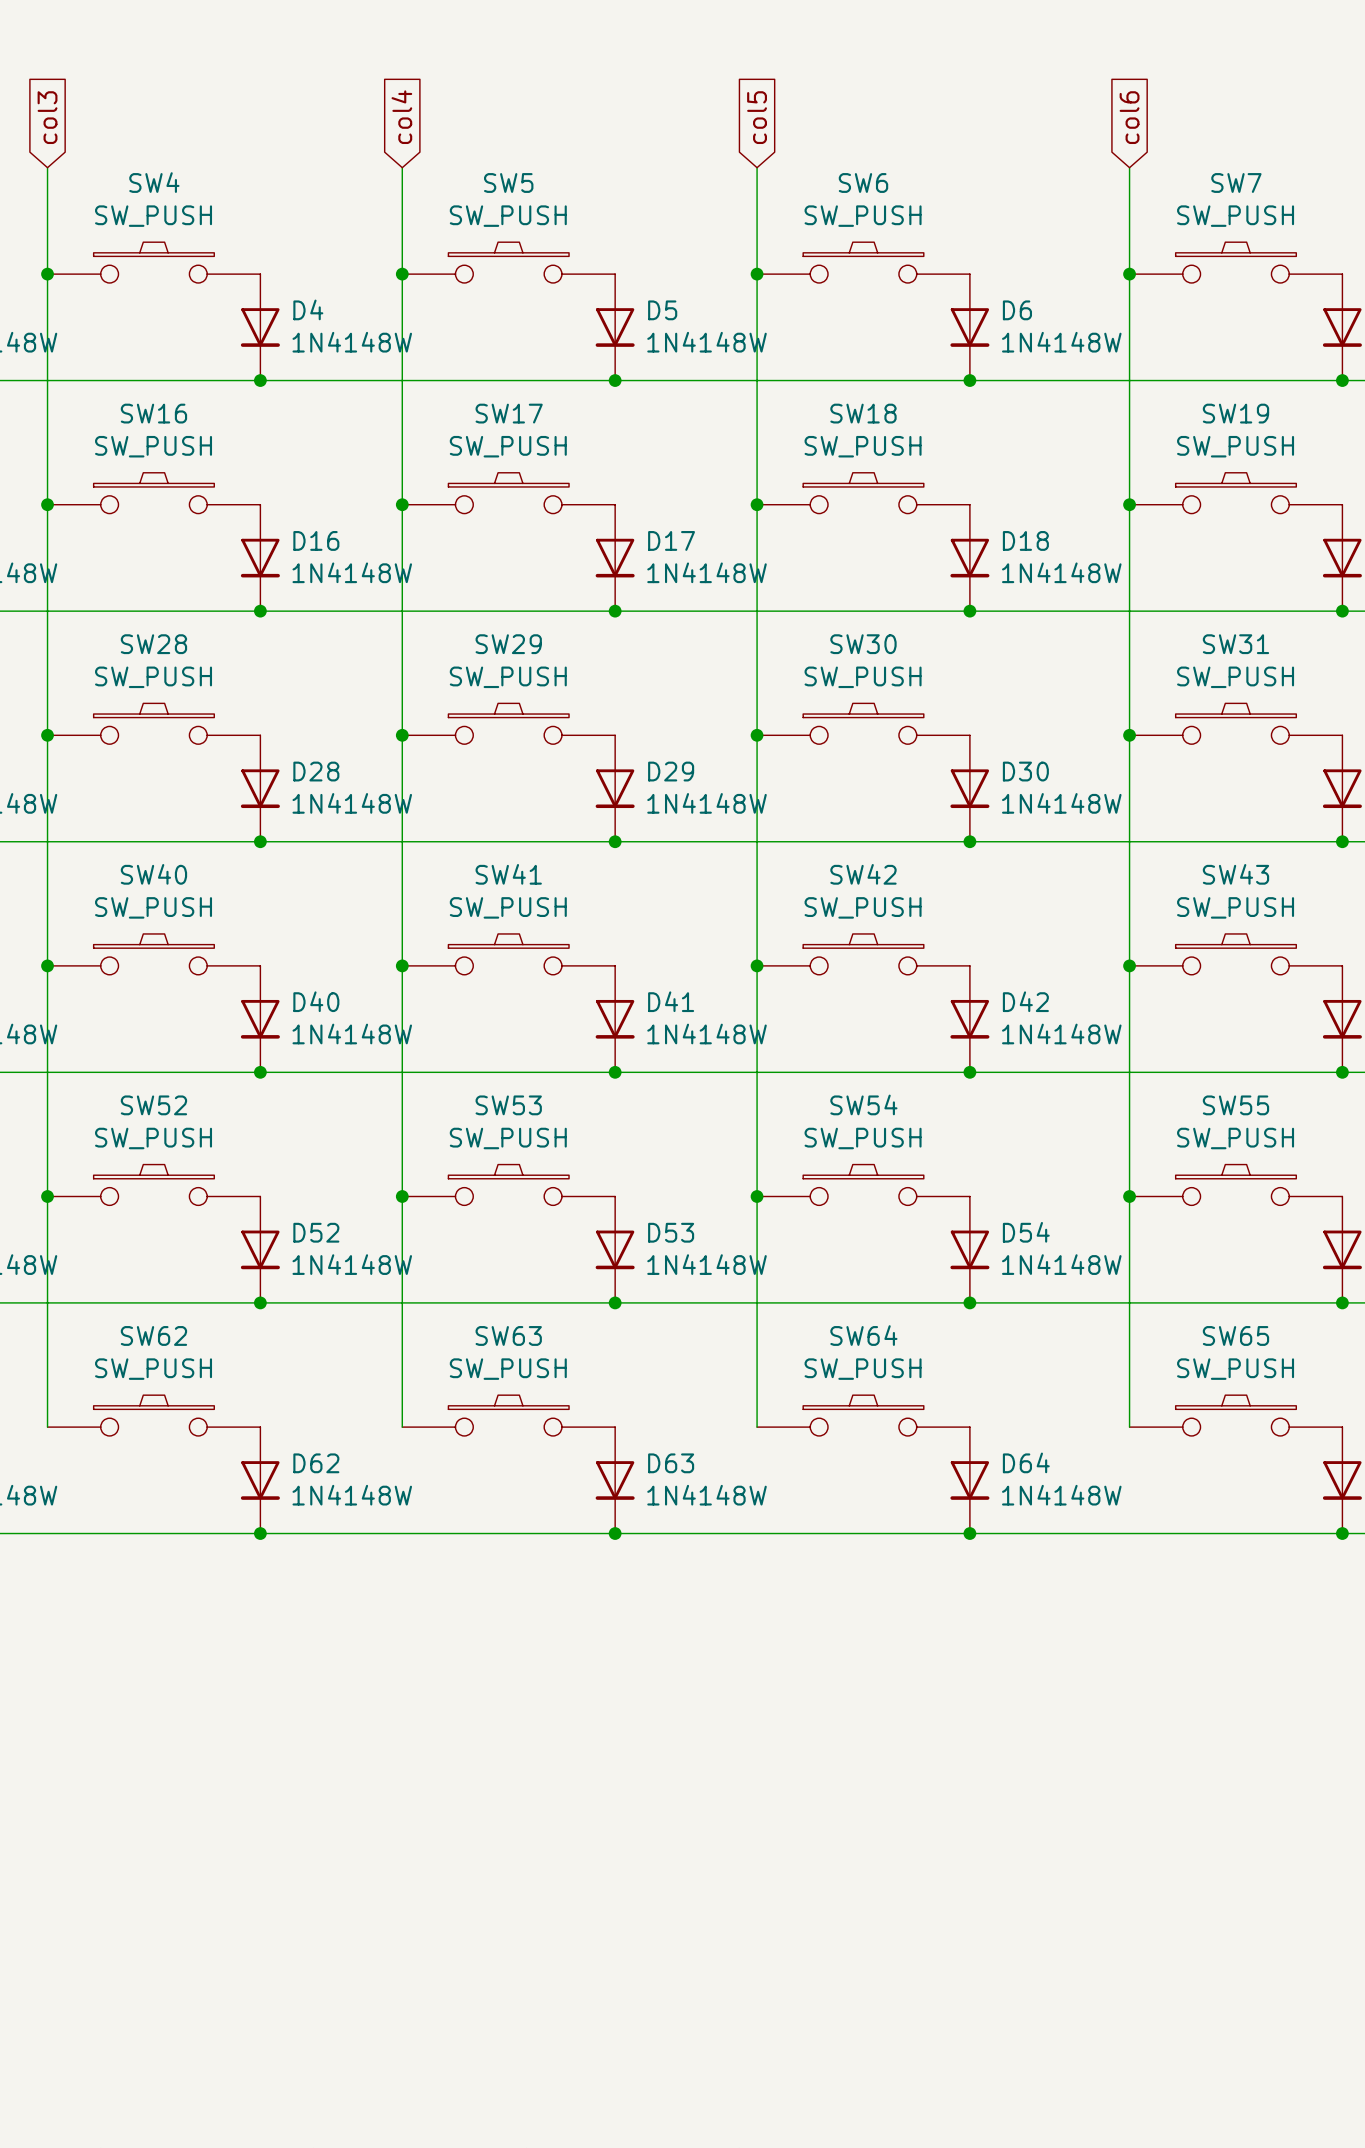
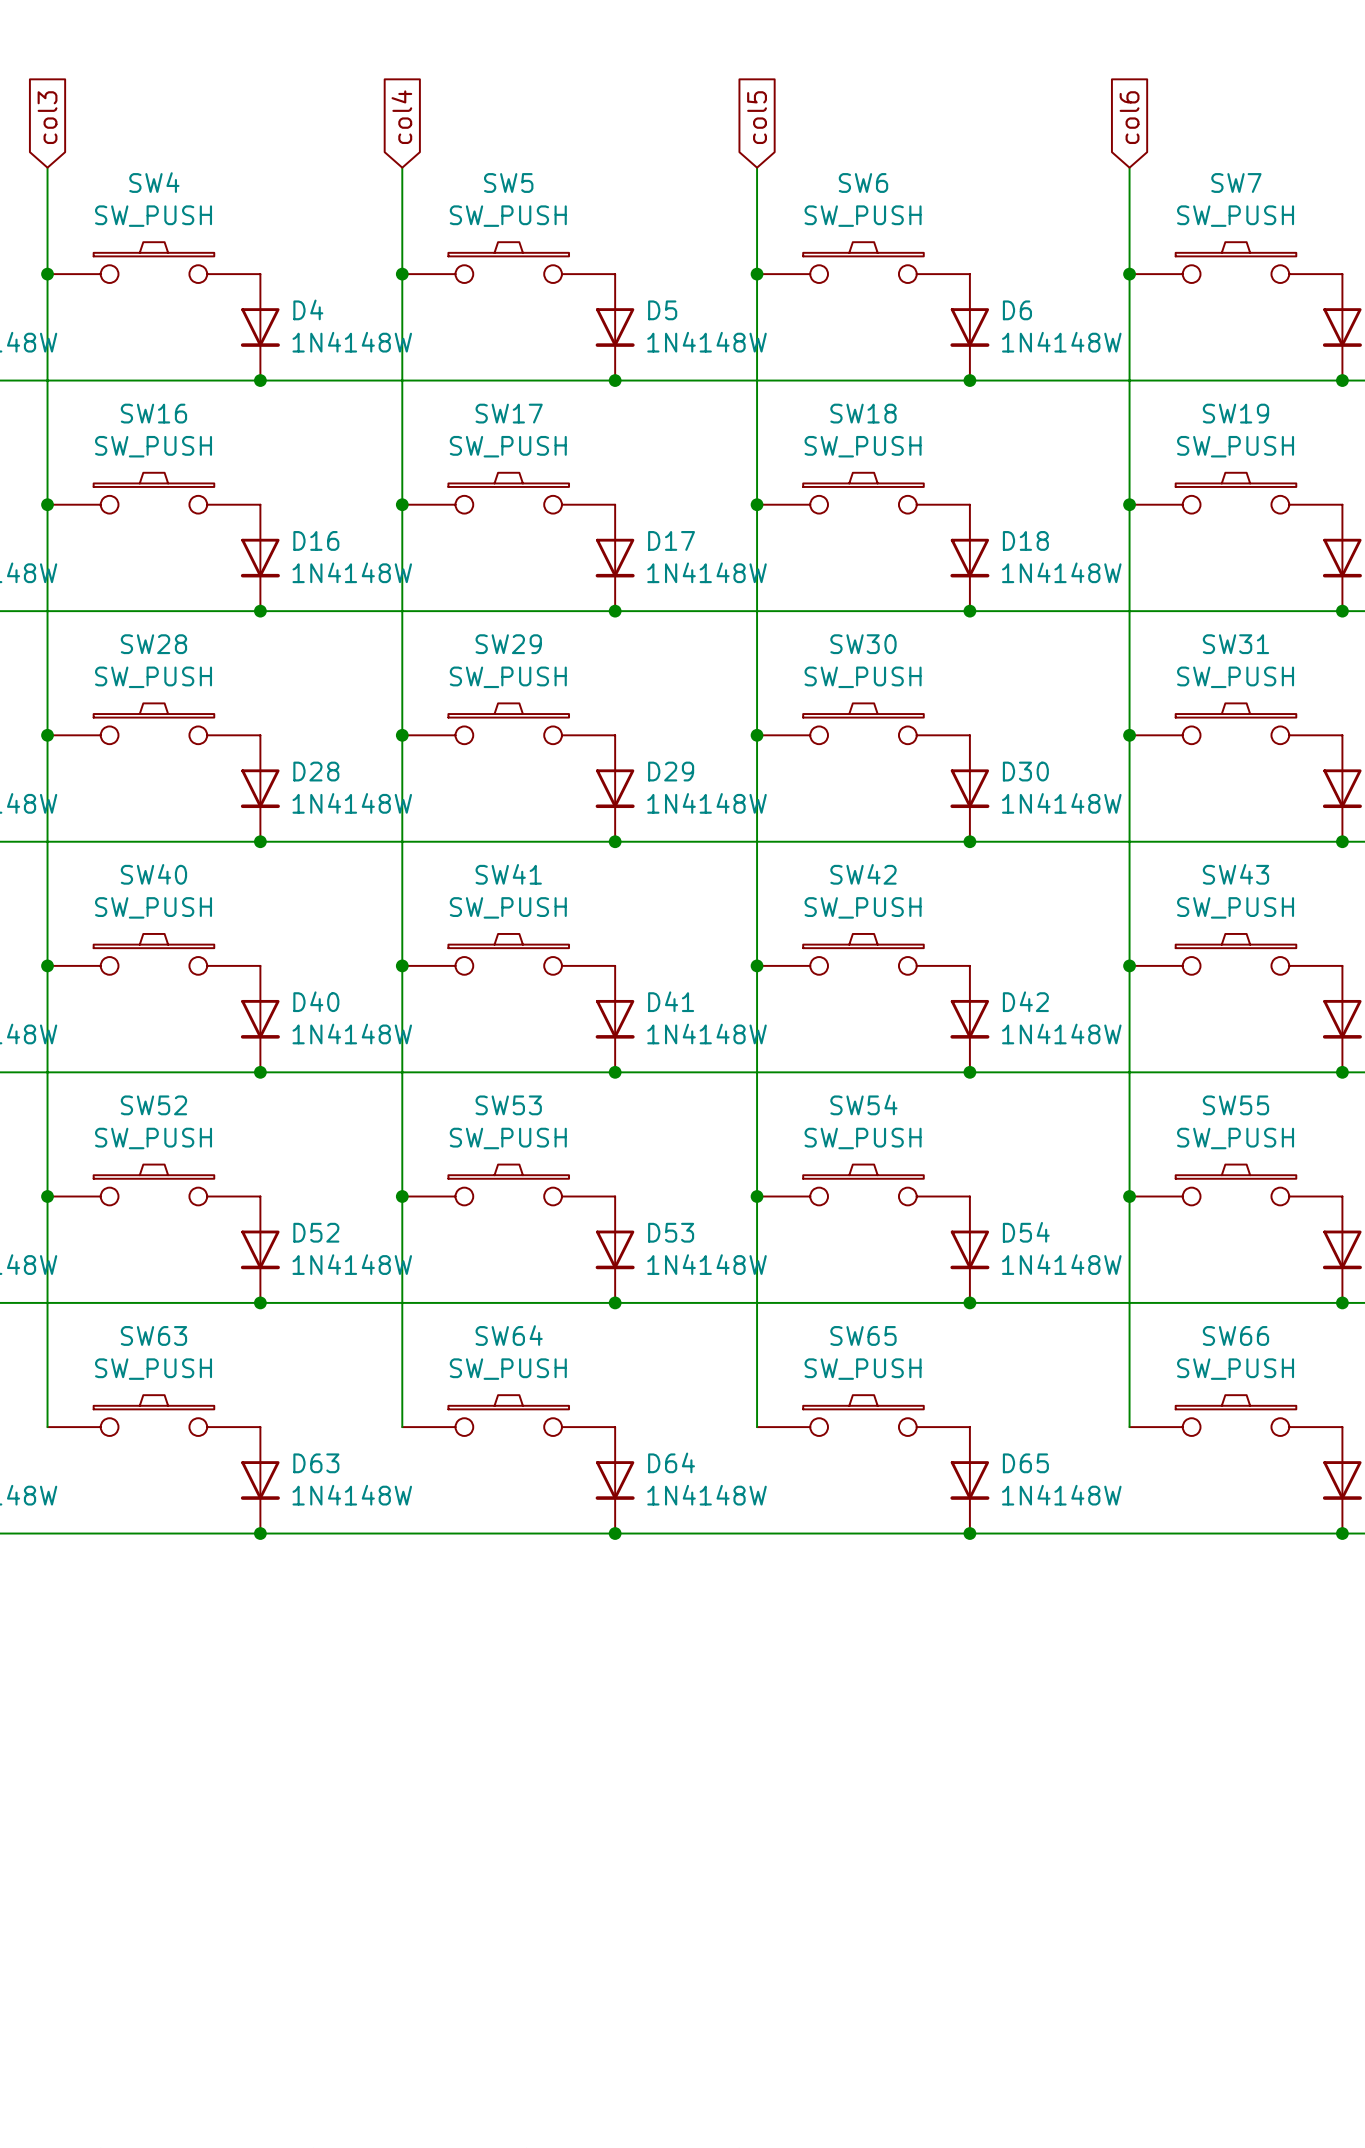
SW62 name: SW62 (153, 1335) -> SW63 (153, 1335)
SW63 name: SW63 (508, 1335) -> SW64 (509, 1335)
SW64 name: SW64 (863, 1335) -> SW65 (863, 1335)
SW65 name: SW65 (1235, 1335) -> SW66 (1235, 1335)
D64 name: D64 (1026, 1462) -> D65 (1025, 1463)
D62 name: D62 (316, 1463) -> D63 (316, 1463)
D63 name: D63 (671, 1463) -> D64 (671, 1462)

